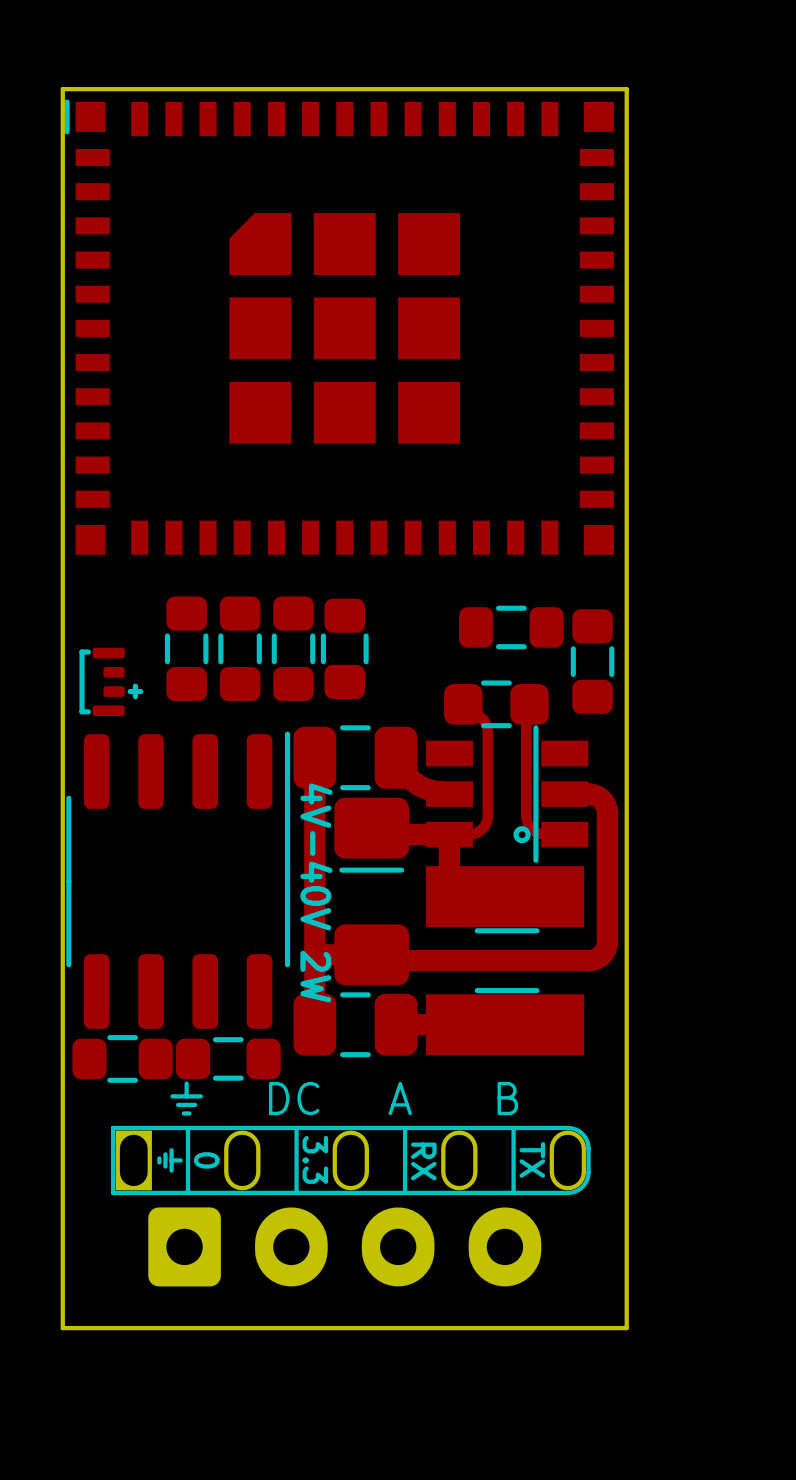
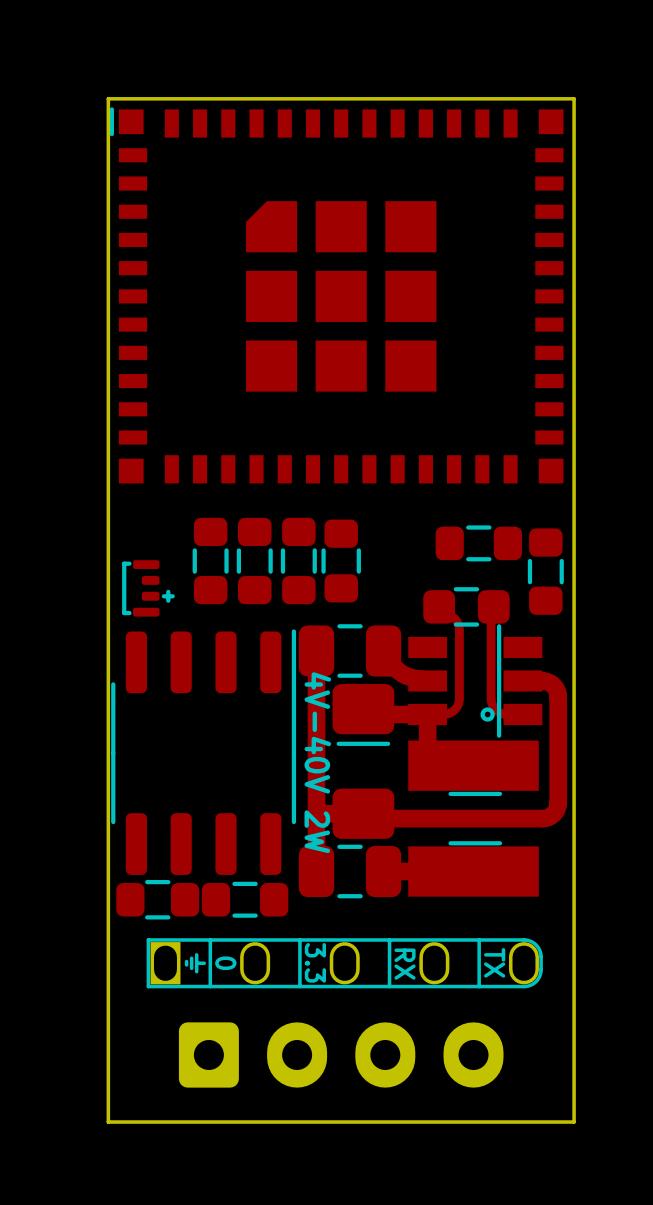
text: ⏚ (186, 1098) -> none
text: DC (294, 1098) -> none
text: A (400, 1098) -> none
text: B (507, 1098) -> none
part footprint: [110, 1125, 591, 1196] -> [146, 938, 543, 989]

